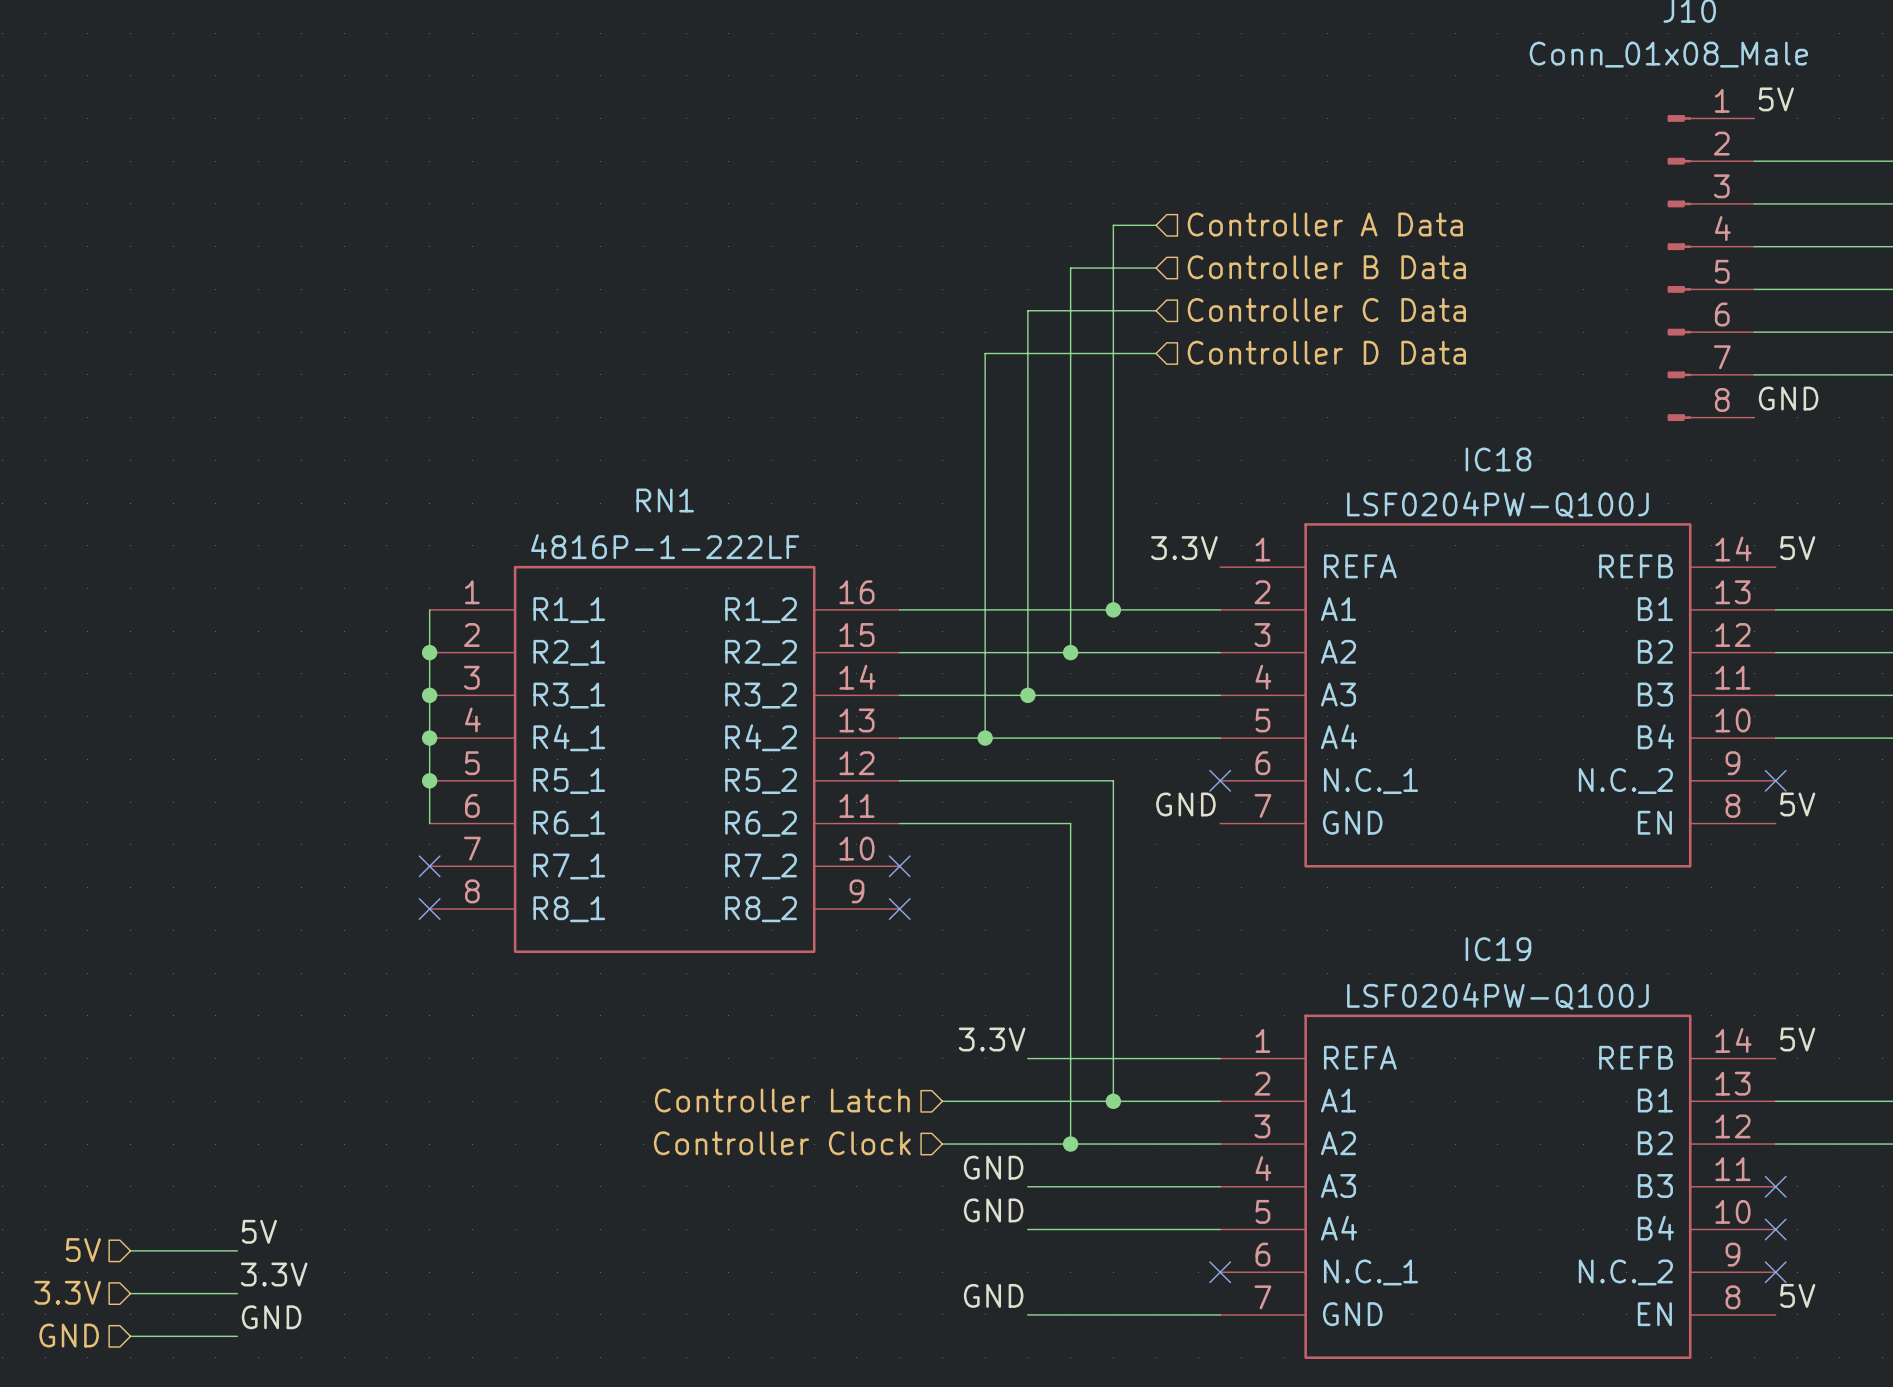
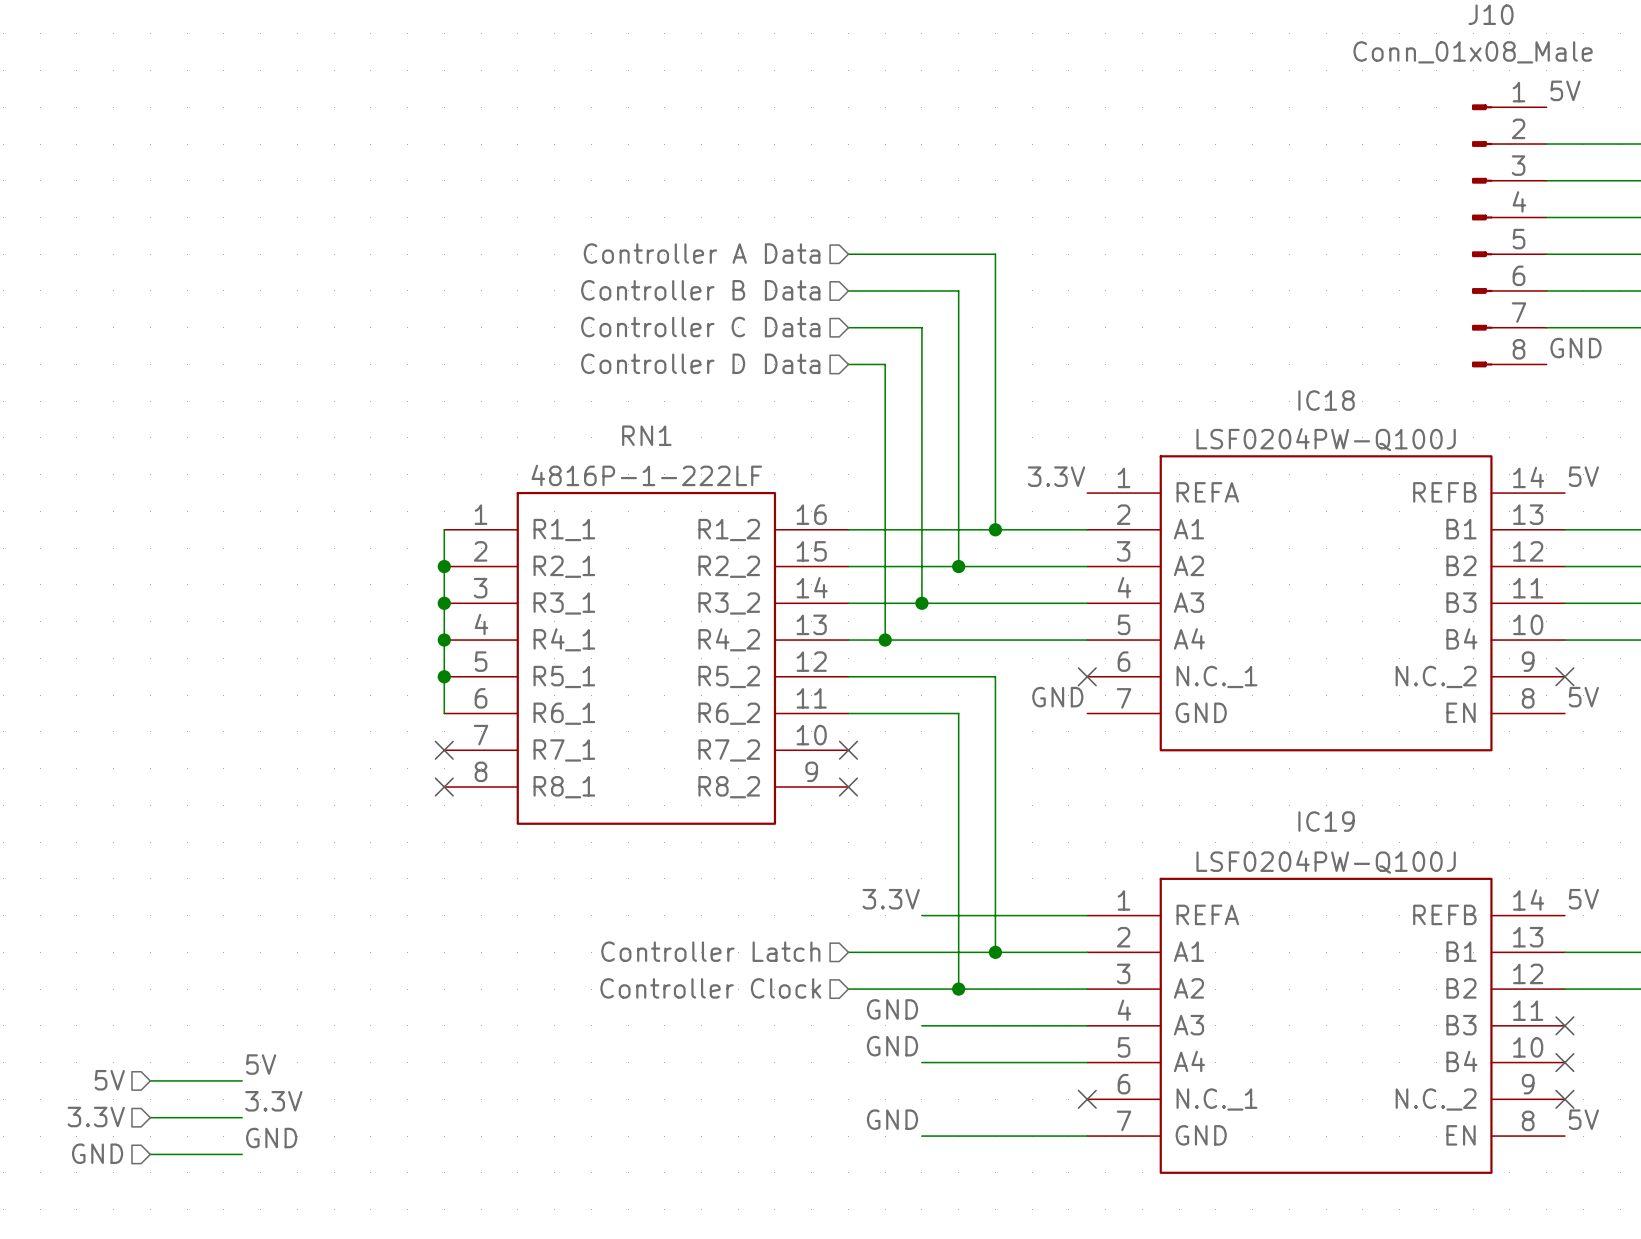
hierarchical label rotation: 0° (1325, 224) -> 180° (702, 253)
hierarchical label position: Controller A Data (1325, 224) -> Controller A Data (702, 253)
wire: (1156, 225) (1113, 225) (1113, 289) -> (848, 254) (995, 254)
hierarchical label rotation: 0° (1326, 267) -> 180° (700, 290)
hierarchical label position: Controller B Data (1326, 267) -> Controller B Data (700, 290)
wire: (1156, 268) (1070, 268) (1070, 332) -> (848, 290) (958, 290)
hierarchical label rotation: 0° (1326, 309) -> 180° (700, 327)
hierarchical label position: Controller C Data (1326, 309) -> Controller C Data (700, 327)
wire: (1156, 310) (1027, 310) (1027, 374) -> (848, 327) (921, 327)
hierarchical label rotation: 0° (1326, 352) -> 180° (700, 363)
hierarchical label position: Controller D Data (1326, 352) -> Controller D Data (700, 363)
wire: (1156, 353) (985, 353) (985, 417) -> (848, 364) (885, 364)
wire: (429, 609) (429, 823) -> (444, 529) (444, 713)
junction: (429, 652) -> none
junction: none -> (444, 566)
junction: (429, 695) -> none
junction: none -> (444, 603)
junction: (429, 738) -> none
junction: none -> (444, 640)
RN1 position: (664, 759) -> (646, 658)
junction: (429, 780) -> none
junction: none -> (444, 676)
no-connect mark: (429, 866) -> none
no-connect mark: none -> (444, 750)
no-connect mark: (899, 866) -> none
no-connect mark: none -> (848, 750)
no-connect mark: (429, 909) -> none
no-connect mark: none -> (444, 787)
no-connect mark: (899, 909) -> none
no-connect mark: none -> (848, 787)

